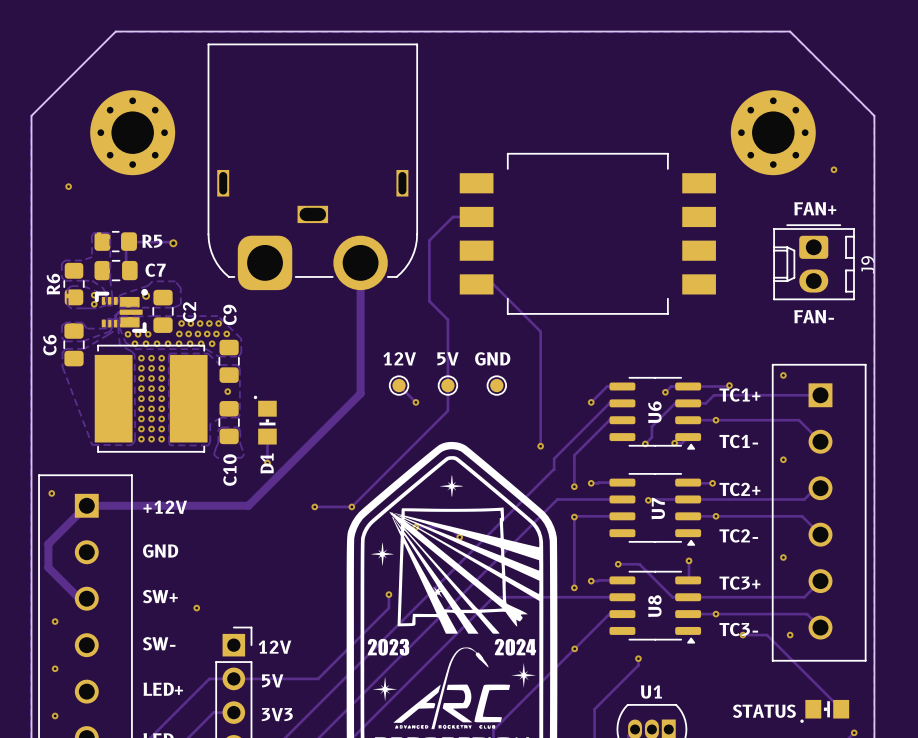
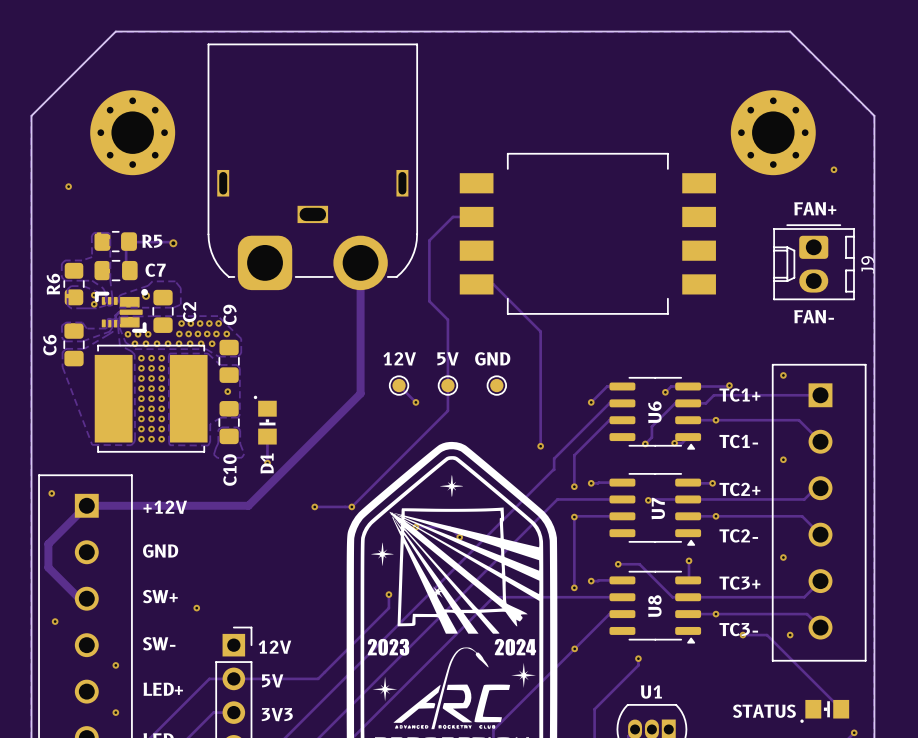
via: none -> (115, 665)
via: (55, 668) -> none
via: none -> (115, 712)
via: (55, 715) -> none

